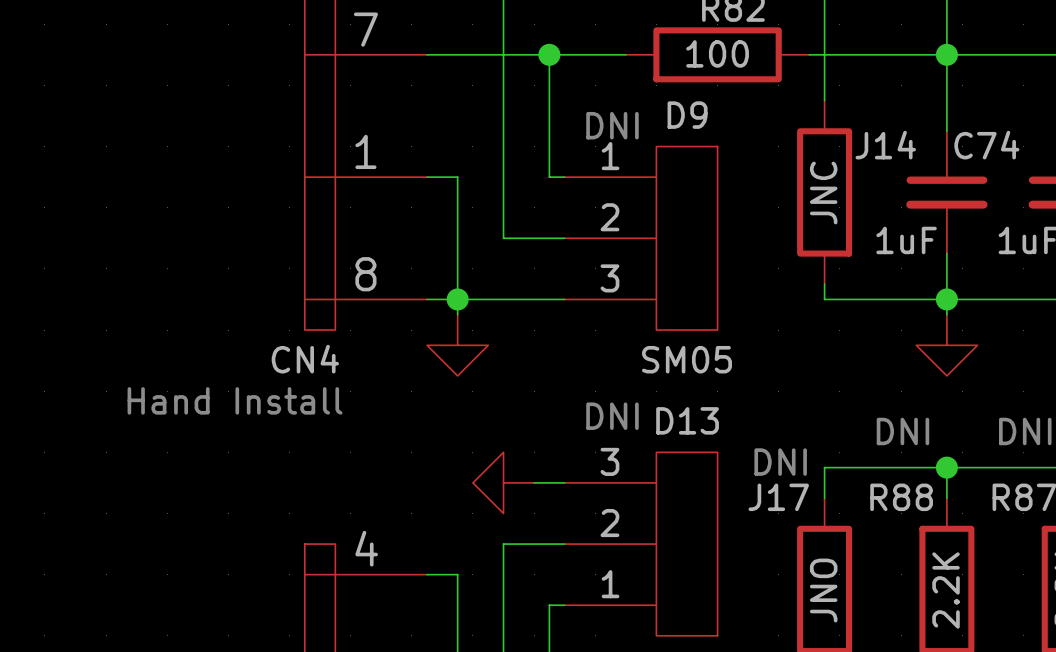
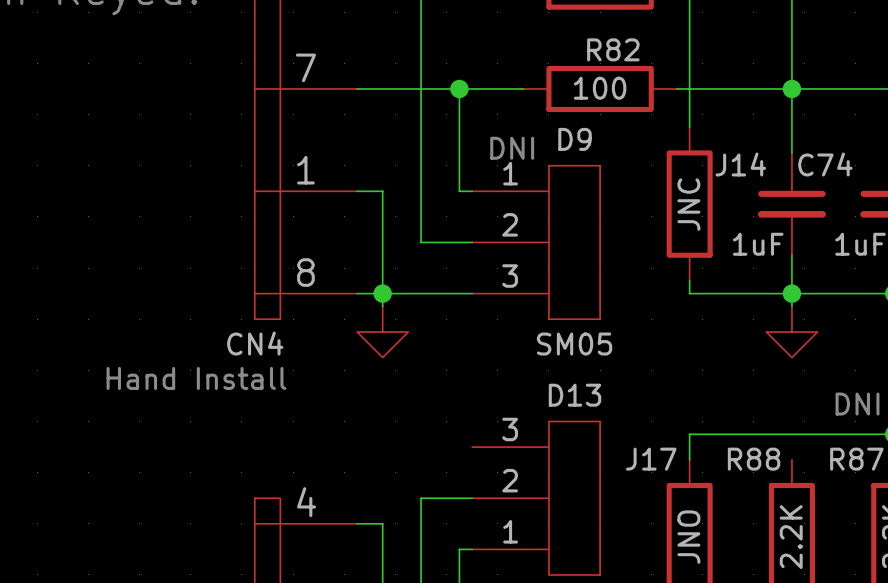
text: DNI (612, 416) -> none
text: DNI (902, 431) -> none
text: DNI (780, 462) -> none
wire: (946, 467) (946, 498) -> none
junction: (946, 467) -> none
power symbol: (503, 482) -> none
wire: (534, 482) (564, 482) -> none

